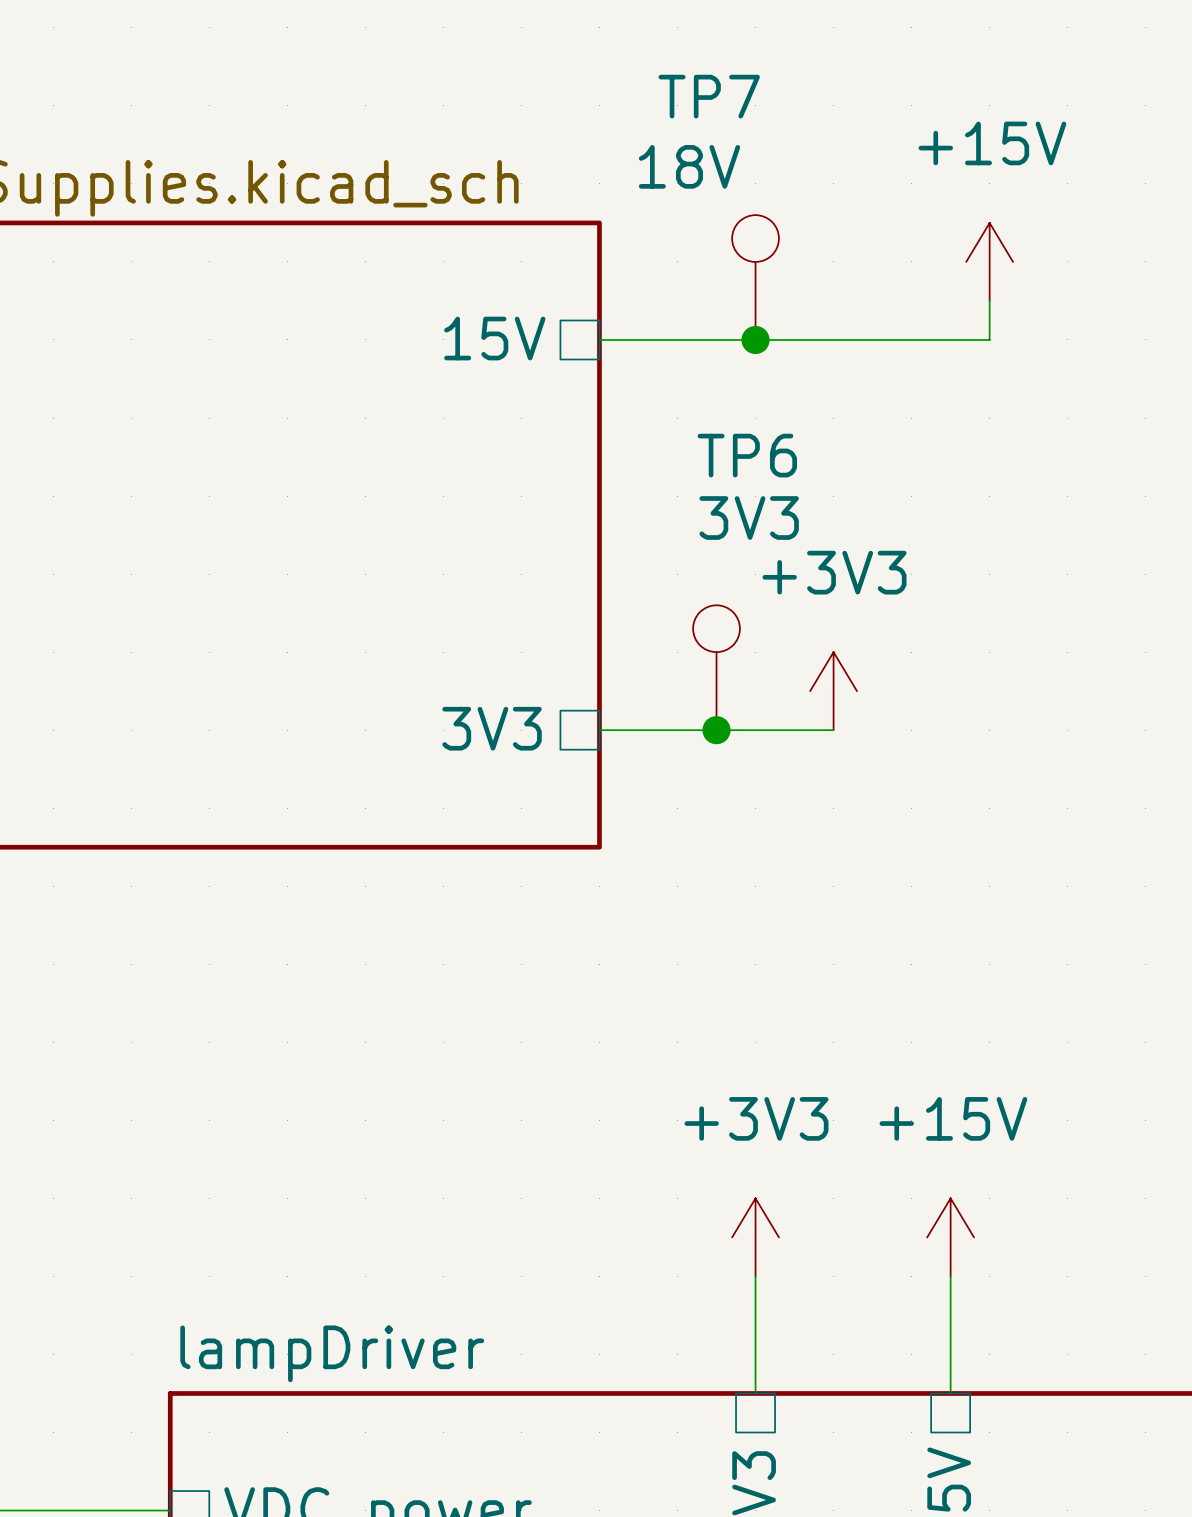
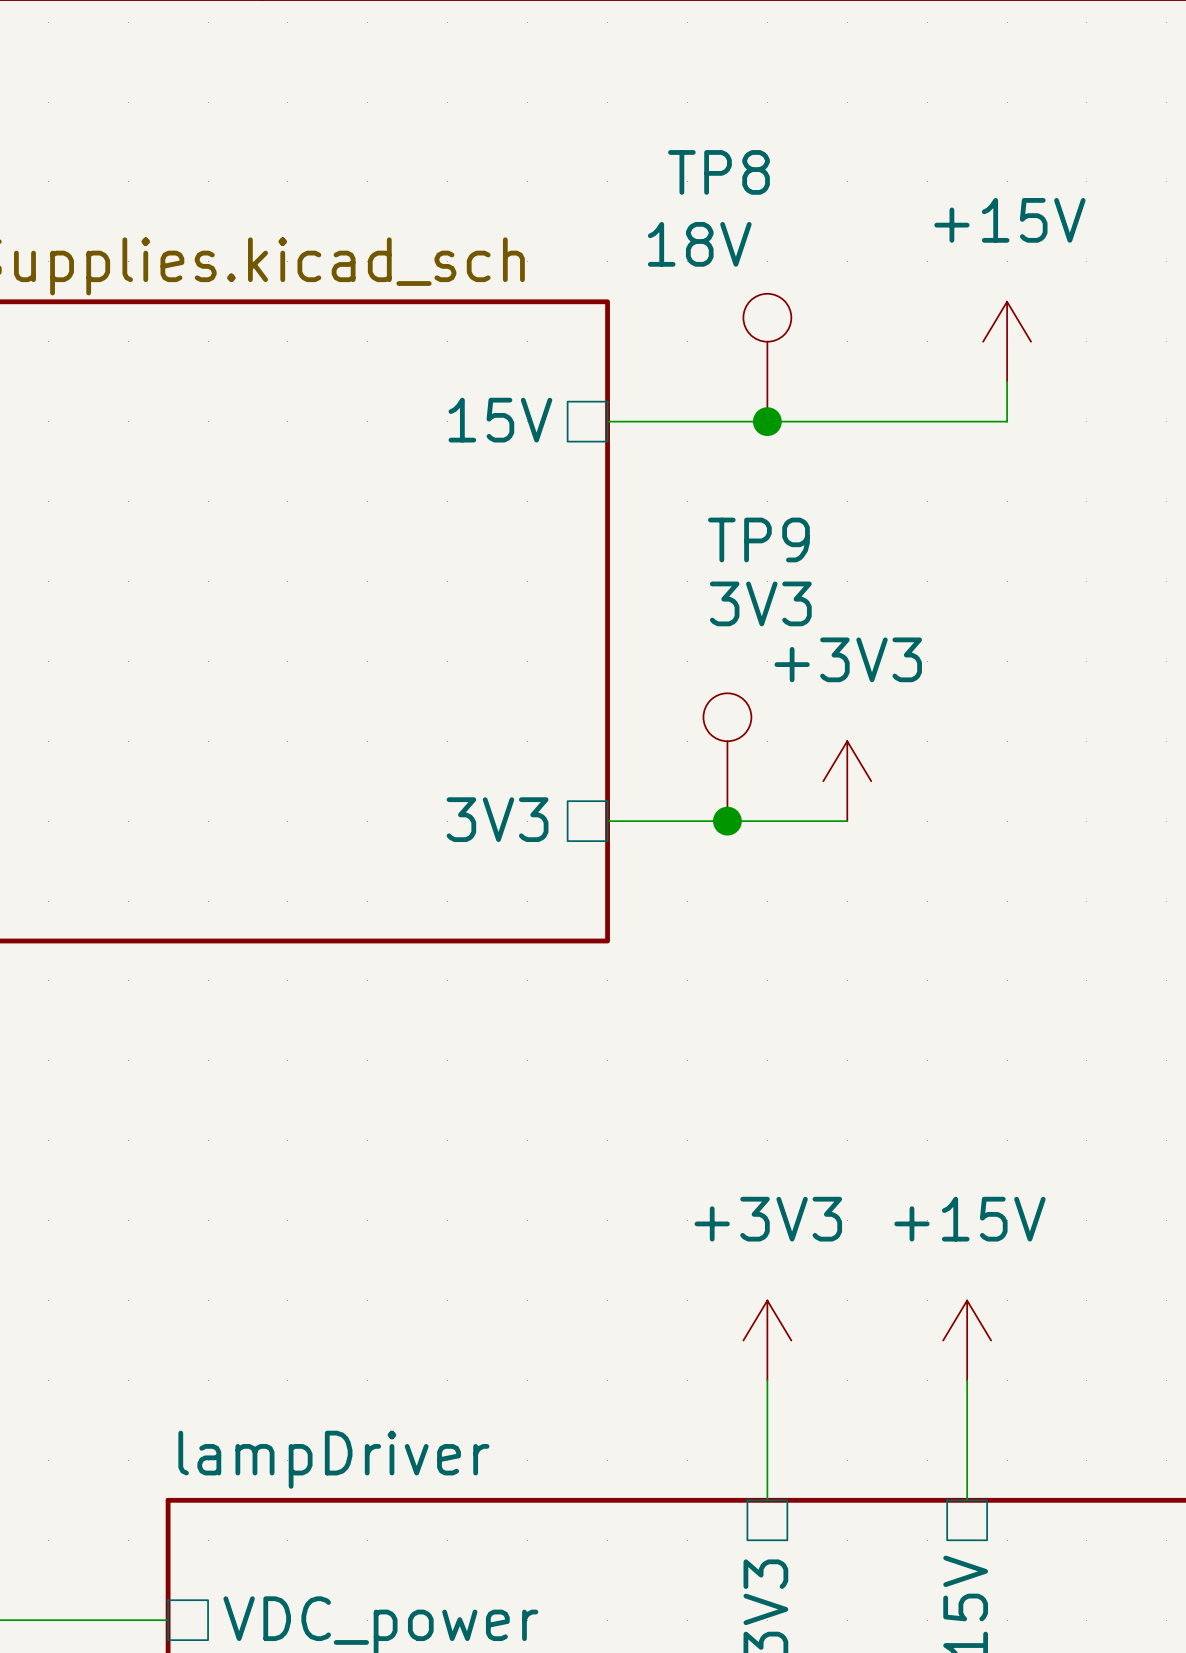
TP7 name: TP7 (709, 96) -> TP8 (718, 172)
TP6 name: TP6 (747, 455) -> TP9 (758, 539)

